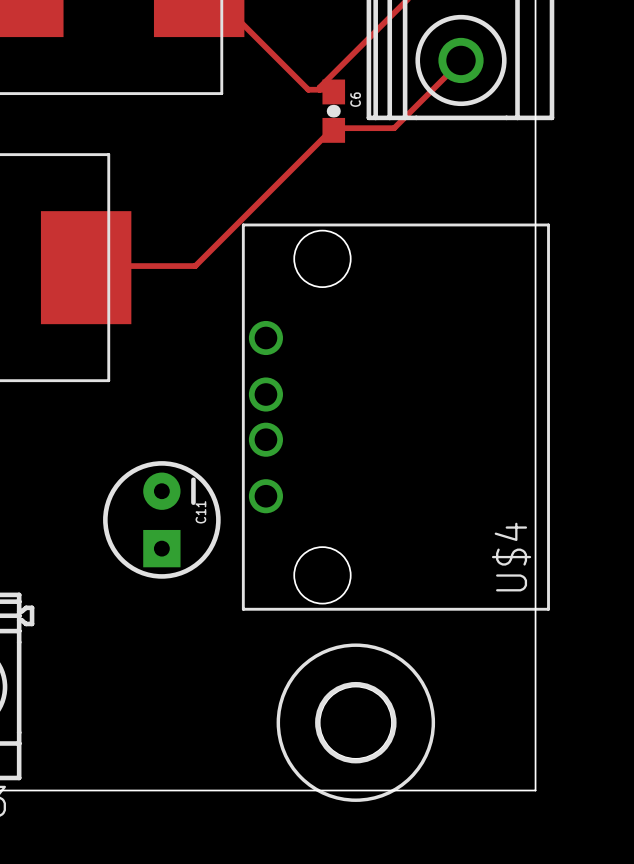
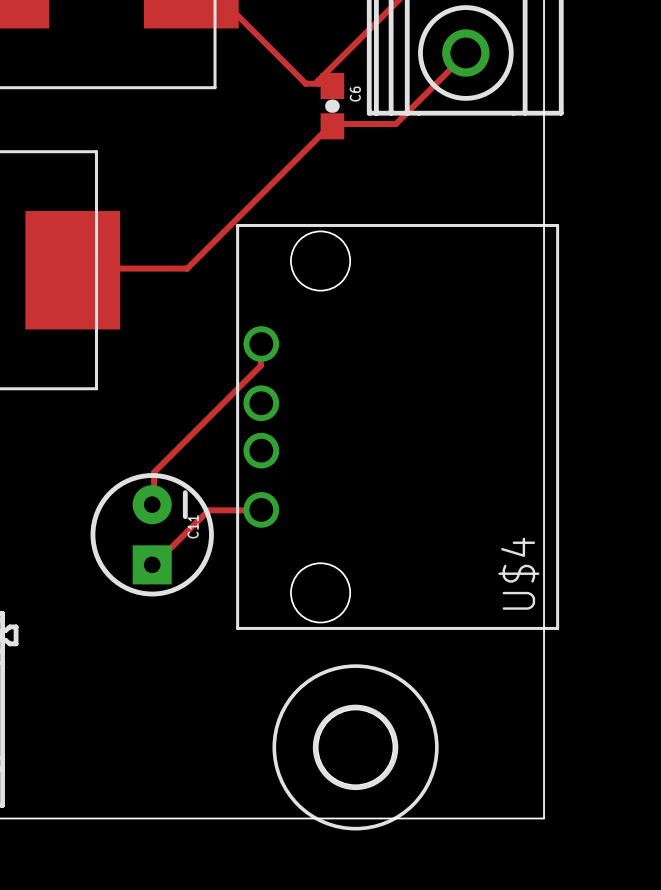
track: none -> (261, 344) (260, 365) (154, 472) (154, 503) (152, 504)
track: none -> (261, 509) (208, 510) (152, 564)

